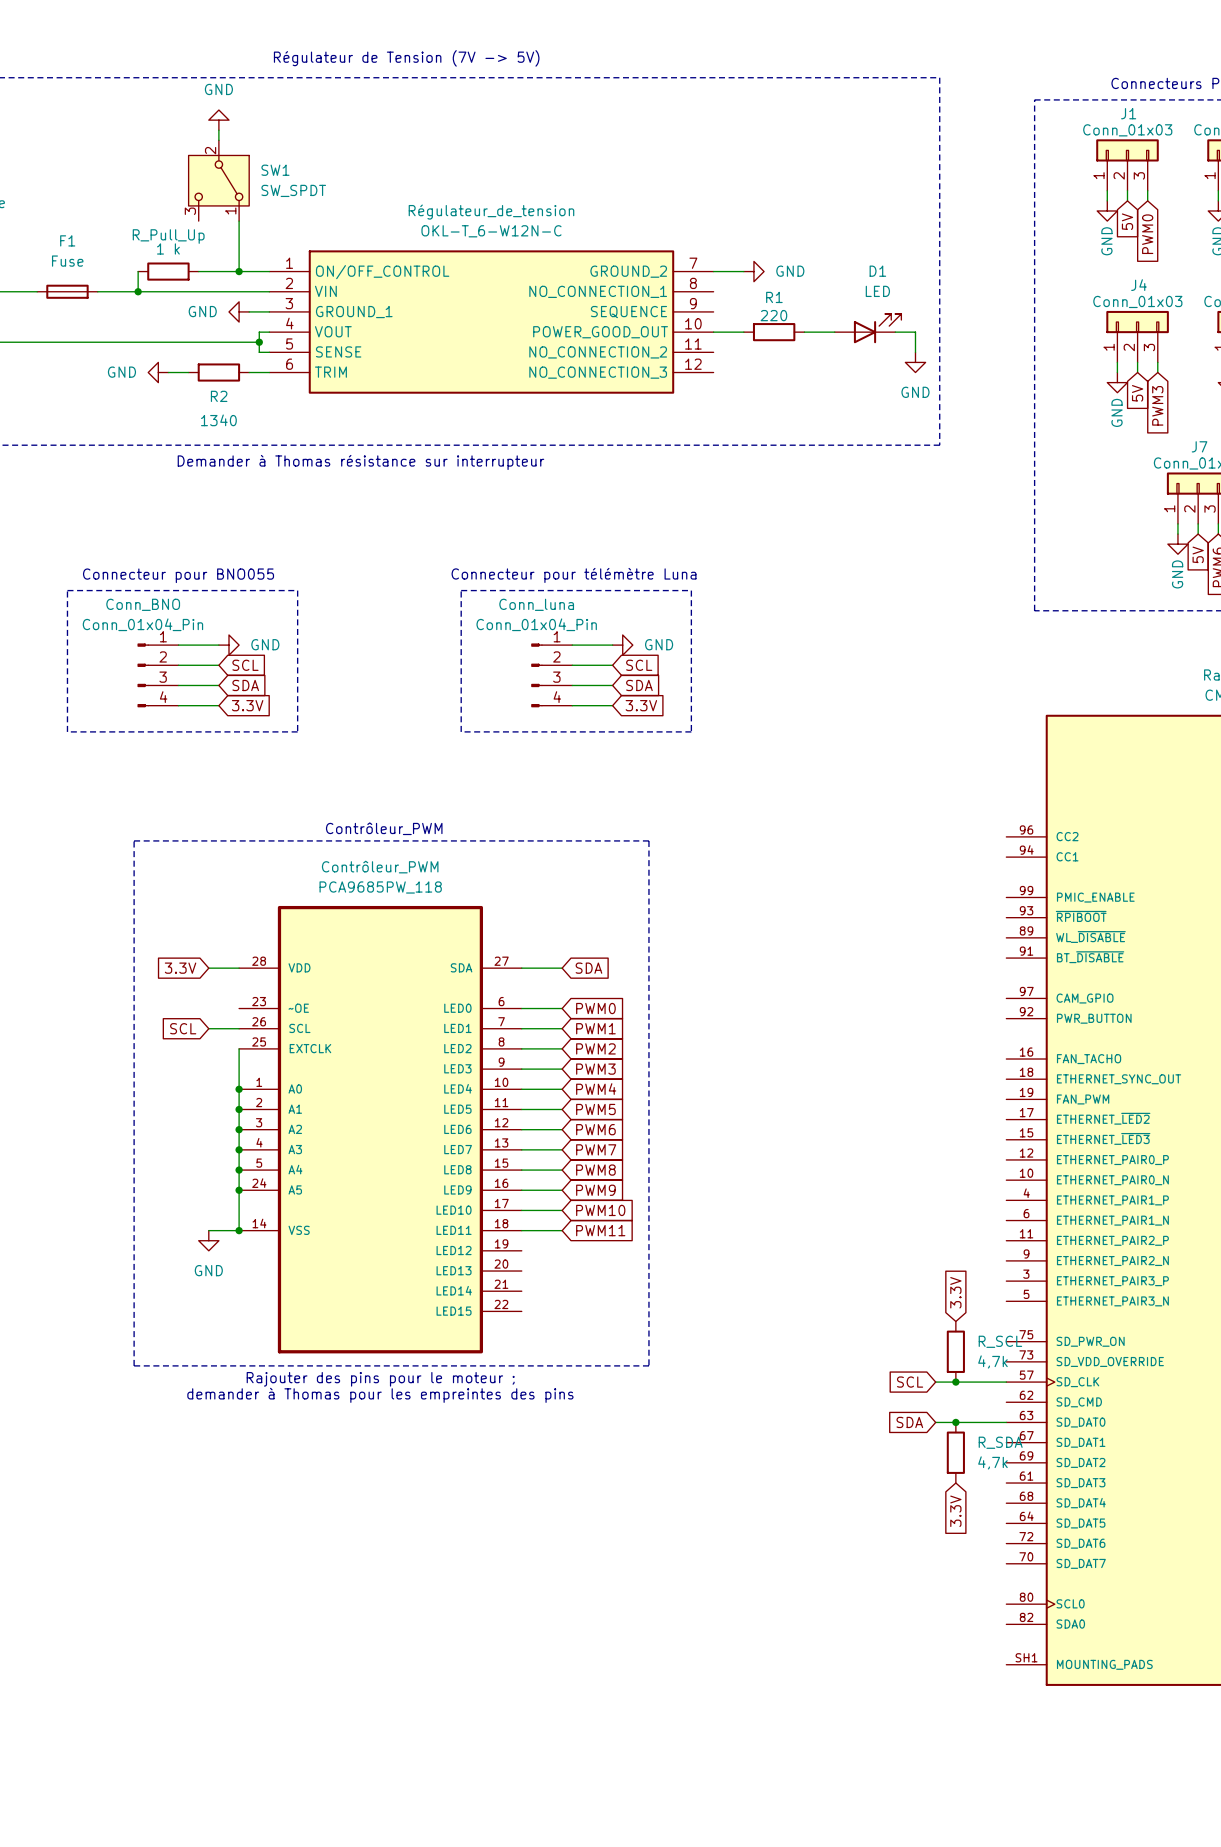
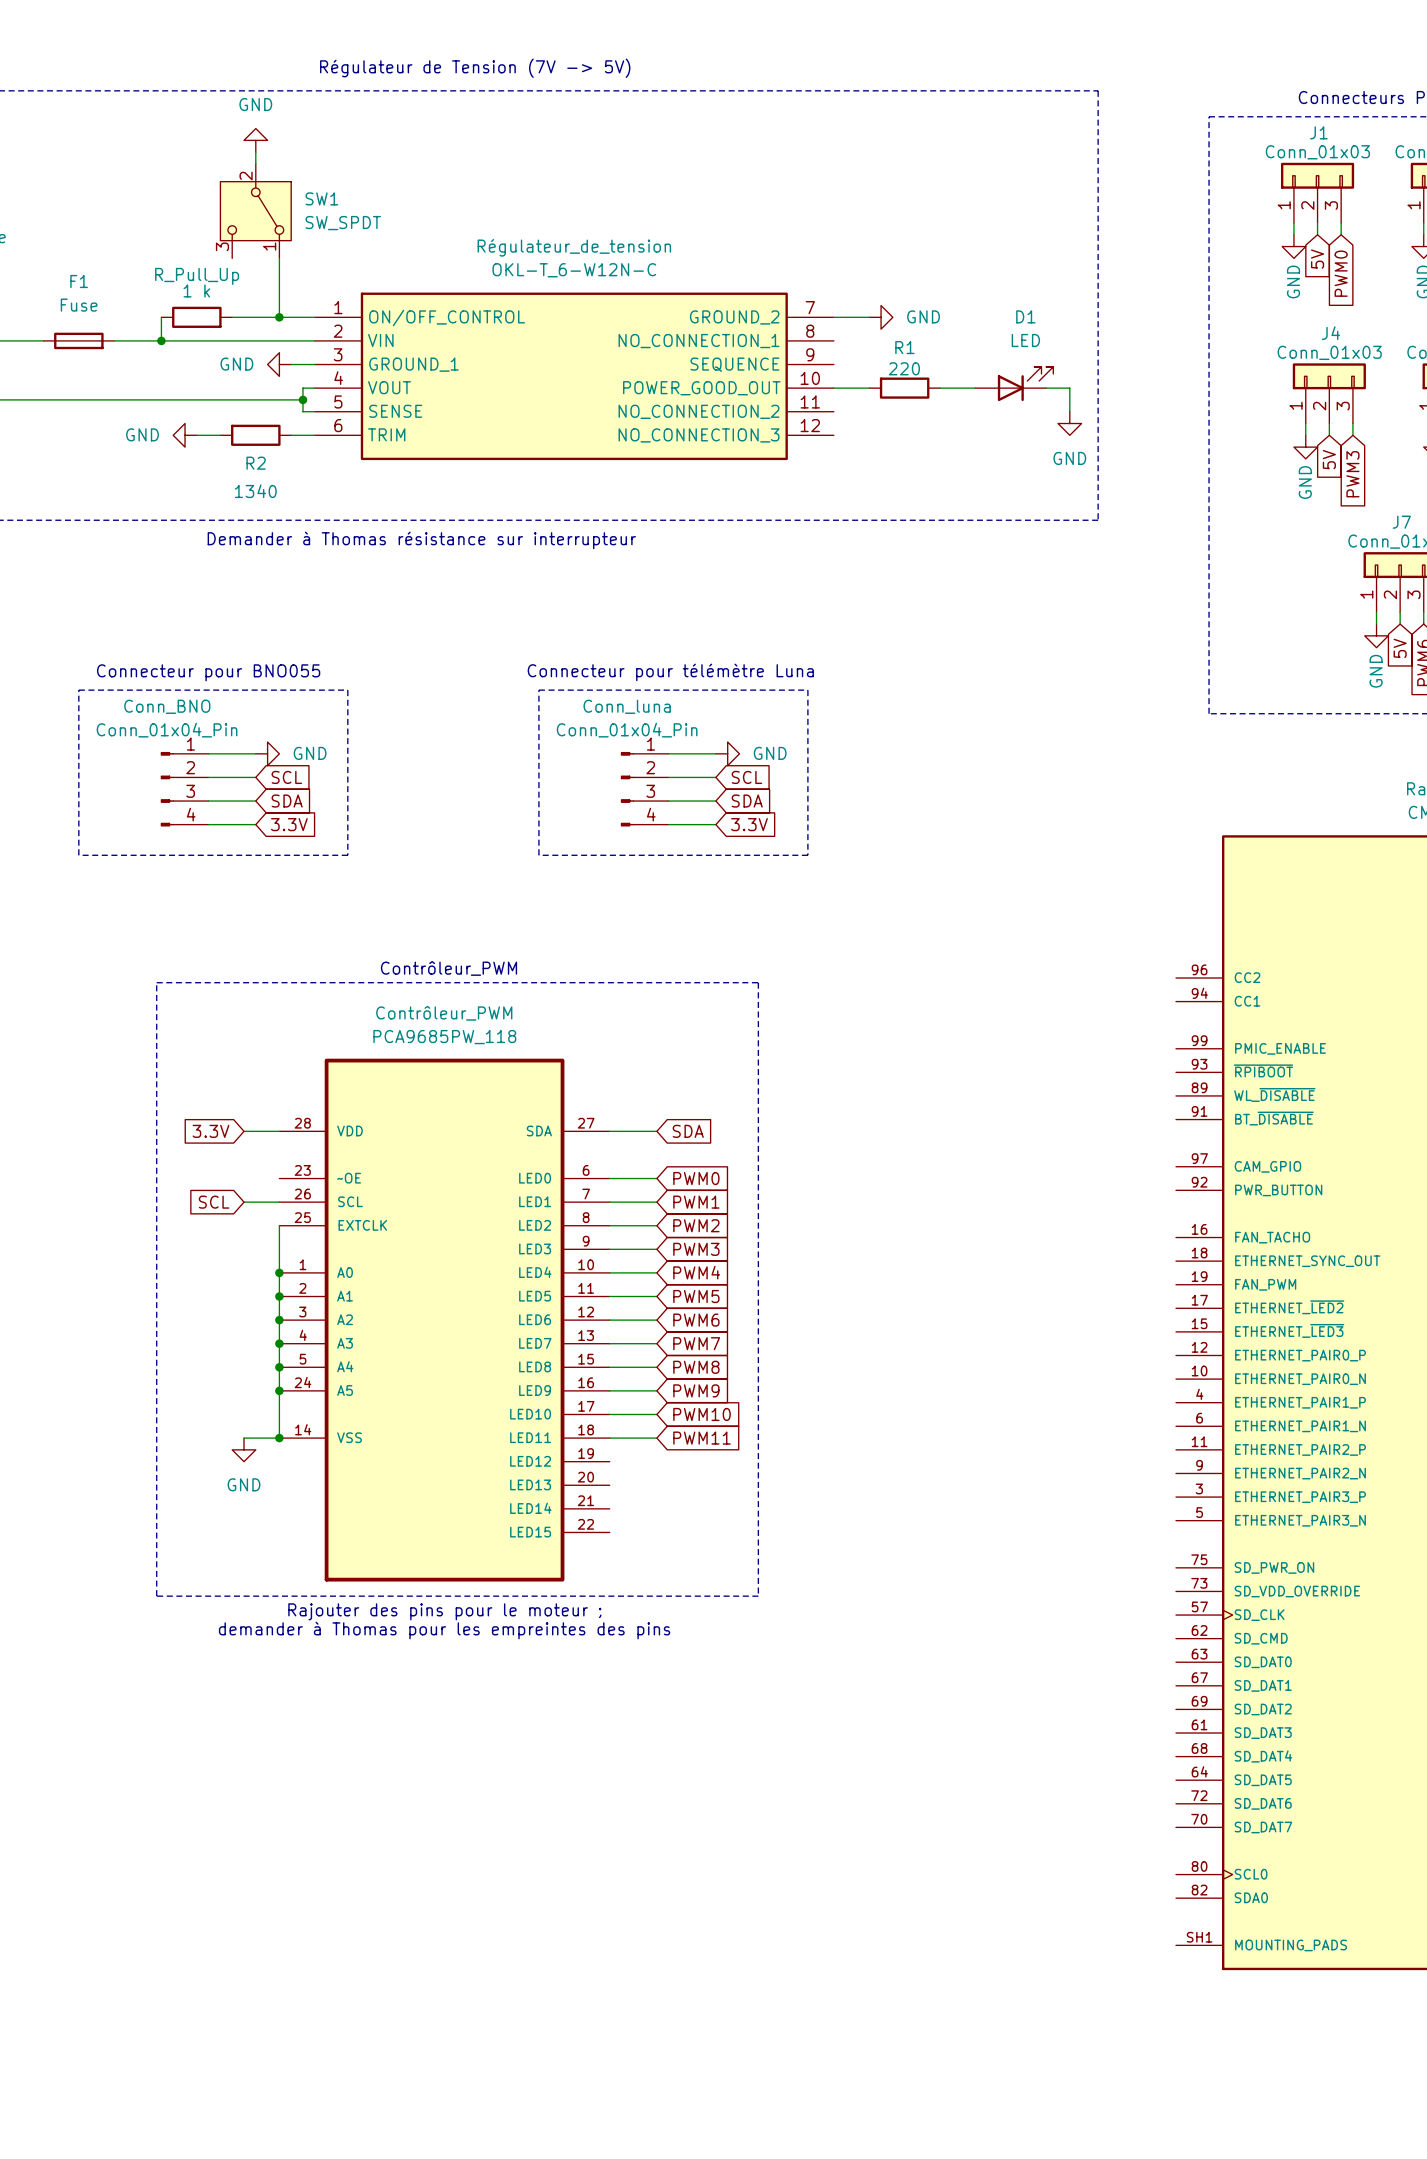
global label: 3.3V (955, 1292) -> none
R_SCL: 4,7k (955, 1351) -> none
global label: SCL (910, 1382) -> none
wire: (935, 1382) (1006, 1382) -> none
junction: (955, 1382) -> none
global label: SDA (909, 1422) -> none
wire: (935, 1422) (1006, 1422) -> none
junction: (955, 1422) -> none
R_SDA: 4,7k (955, 1452) -> none
global label: 3.3V (955, 1511) -> none

